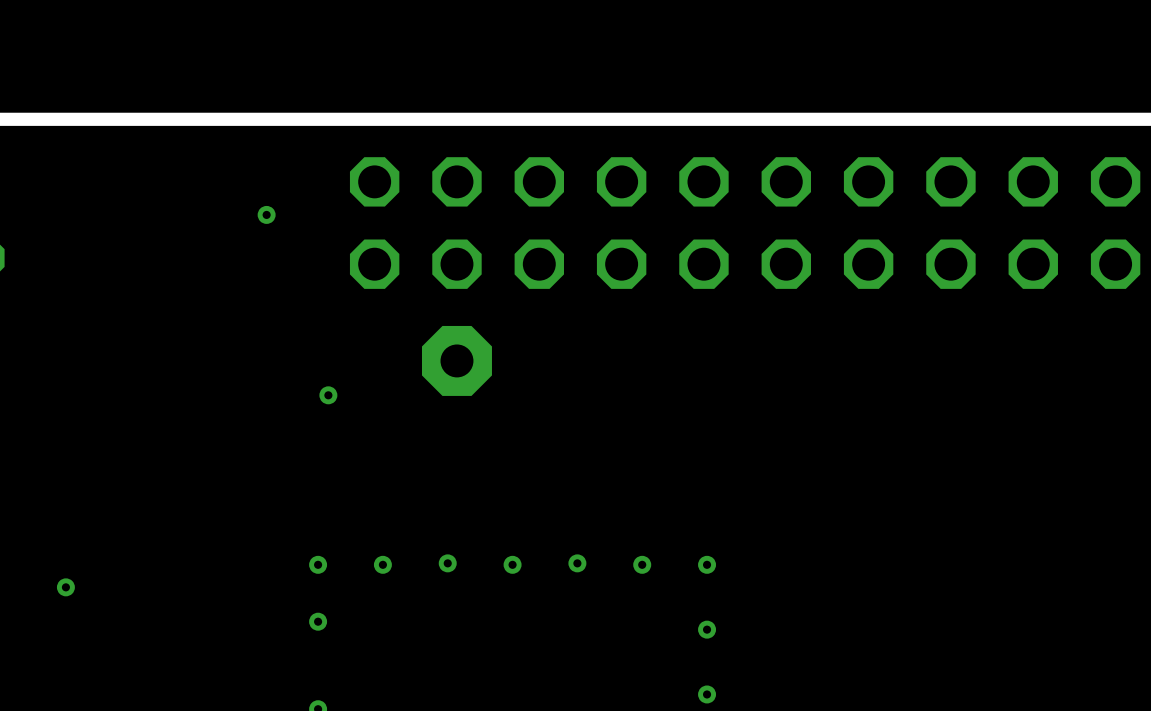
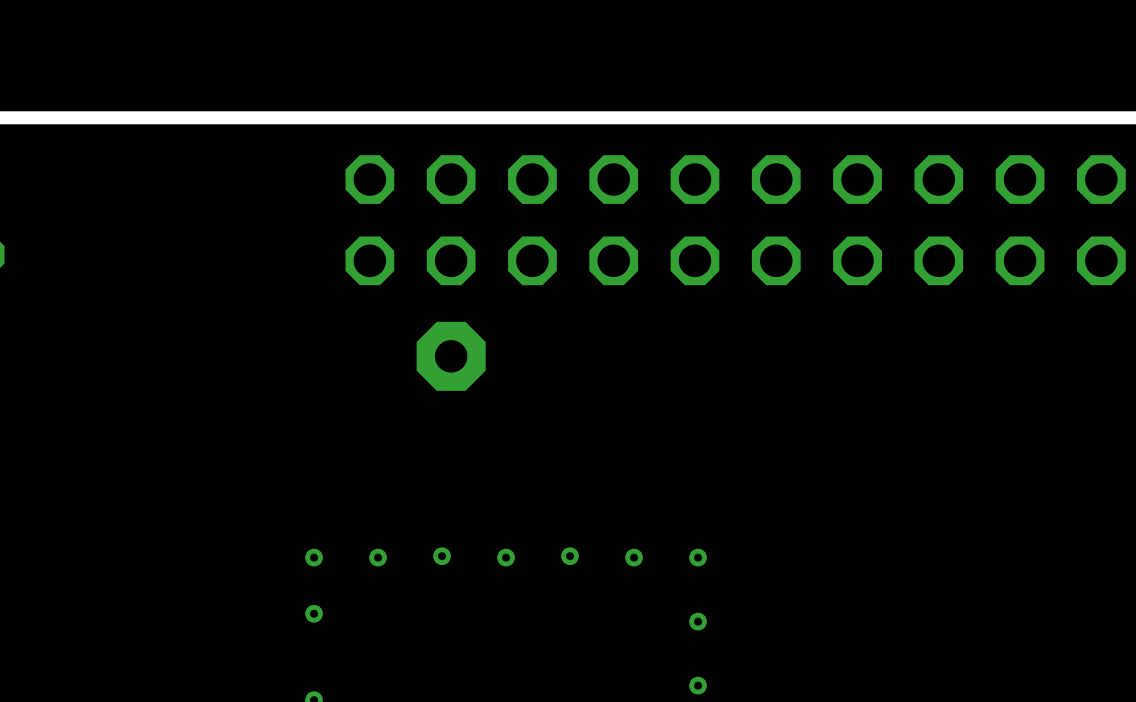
via: (266, 214) -> none
via: (328, 395) -> none
via: (65, 587) -> none

